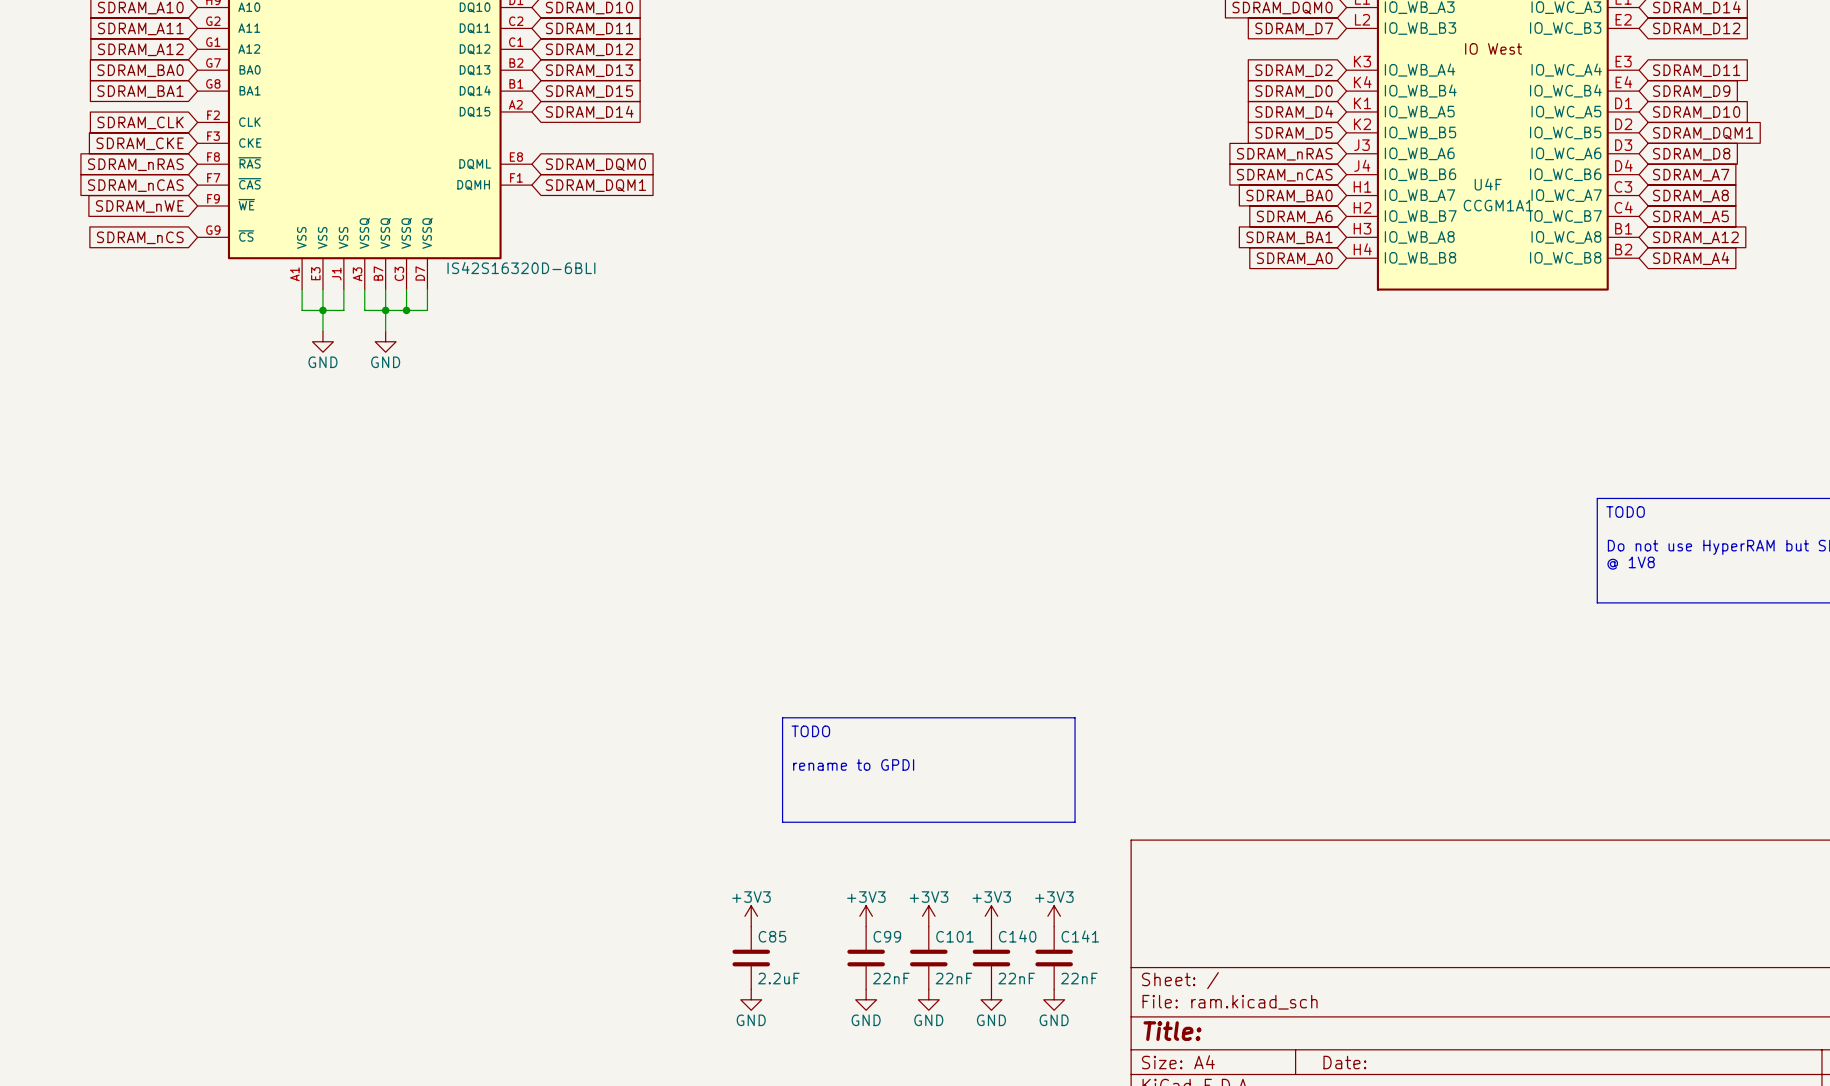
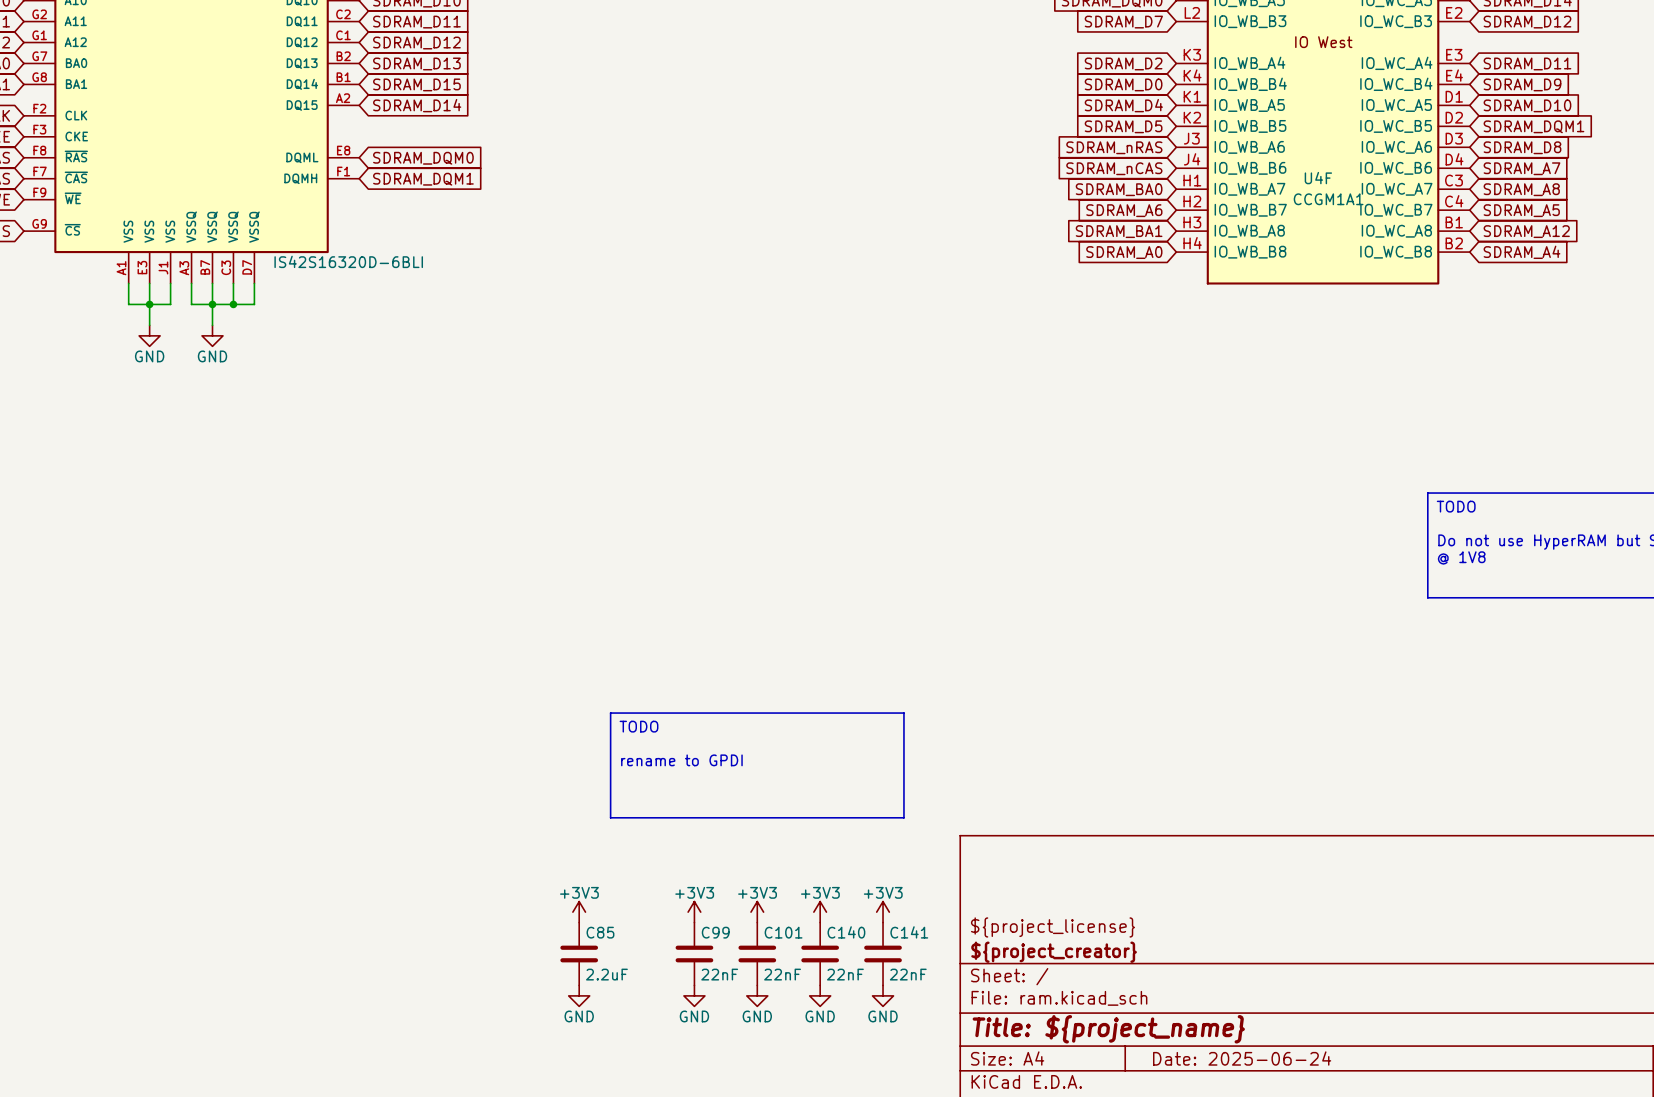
title block: none -> ${project_license} (1052, 927)
title block: none -> ${project_creator} (1054, 952)
title block: Title: (1172, 1031) -> Title: ${project_name} (1108, 1029)
title block: Date: (1344, 1062) -> Date: 2025-06-24 (1242, 1058)

